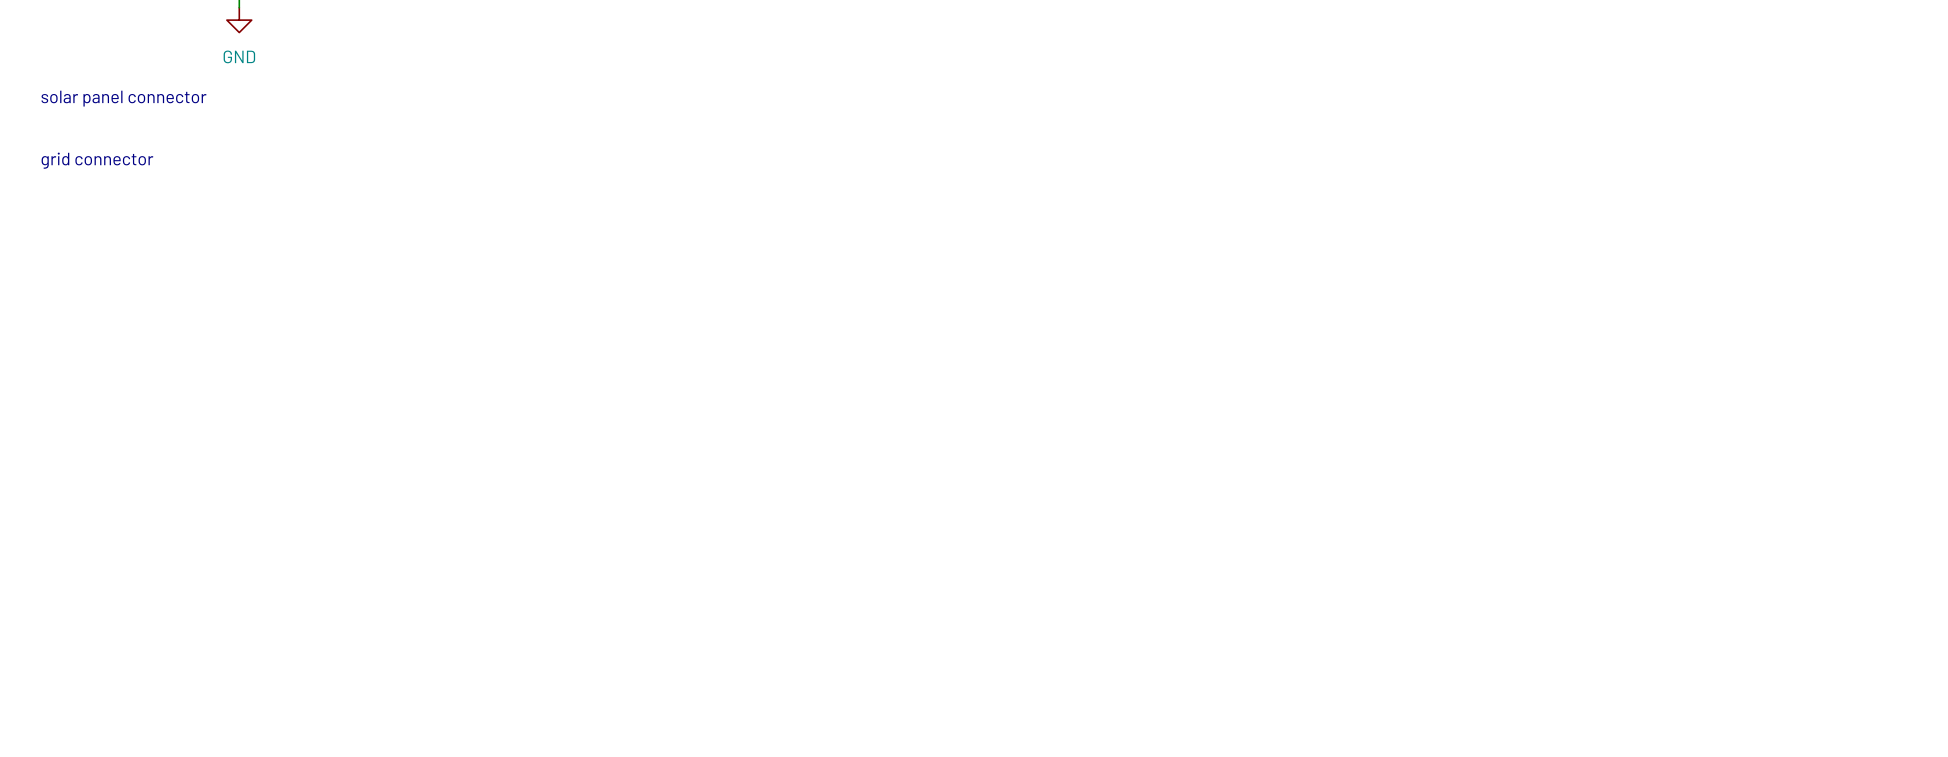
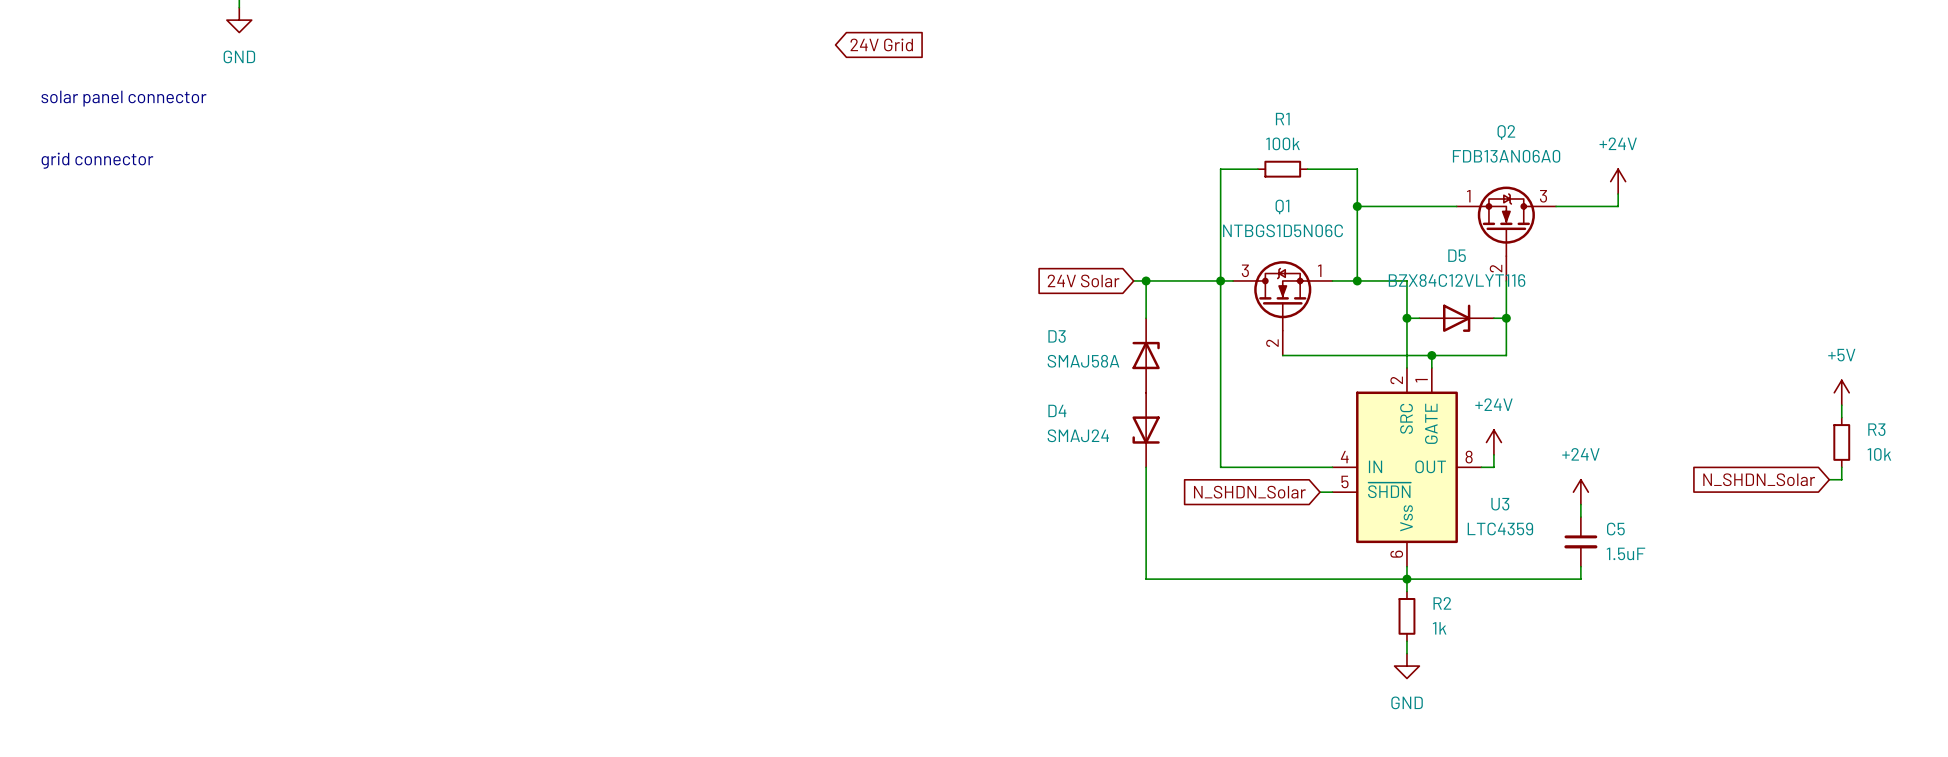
global label: none -> 24V Grid (881, 44)
wire: none -> (1257, 169) (1220, 169) (1220, 467) (1332, 467)
R1: none -> 100k (1282, 169)
wire: none -> (1307, 169) (1357, 169) (1357, 280)
power symbol: none -> +24V (1618, 181)
wire: none -> (1618, 194) (1618, 206) (1556, 206)
wire: none -> (1357, 206) (1456, 206)
junction: none -> (1357, 206)
Q2: none -> FDB13AN06A0 (1506, 233)
global label: none -> 24V Solar (1083, 280)
wire: none -> (1133, 280) (1233, 280)
wire: none -> (1146, 280) (1146, 318)
junction: none -> (1146, 280)
junction: none -> (1220, 280)
wire: none -> (1332, 280) (1406, 280) (1406, 367)
junction: none -> (1357, 280)
wire: none -> (1506, 280) (1506, 355) (1282, 355)
Q1: none -> NTBGS1D5N06C (1282, 308)
wire: none -> (1406, 318) (1419, 318)
junction: none -> (1406, 318)
D5: none -> BZX84C12VLYT116 (1456, 318)
wire: none -> (1493, 318) (1506, 318)
junction: none -> (1506, 318)
D3: none -> SMAJ58A (1146, 355)
wire: none -> (1431, 355) (1431, 367)
junction: none -> (1431, 355)
power symbol: none -> +5V (1841, 392)
wire: none -> (1841, 405) (1841, 417)
D4: none -> SMAJ24 (1146, 430)
power symbol: none -> +24V (1493, 442)
R3: none -> 10k (1841, 442)
wire: none -> (1493, 454) (1493, 467) (1481, 467)
wire: none -> (1146, 467) (1146, 579) (1580, 579) (1580, 566)
U3: none -> LTC4359 (1406, 467)
wire: none -> (1841, 467) (1841, 479) (1829, 479)
global label: none -> N_SHDN_Solar (1759, 479)
global label: none -> N_SHDN_Solar (1249, 492)
wire: none -> (1320, 492) (1332, 492)
power symbol: none -> +24V (1580, 492)
wire: none -> (1580, 504) (1580, 517)
C5: none -> 1.5uF (1580, 541)
wire: none -> (1406, 566) (1406, 591)
junction: none -> (1406, 579)
R2: none -> 1k (1406, 616)
wire: none -> (1406, 641) (1406, 653)
power symbol: none -> GND (1406, 666)

